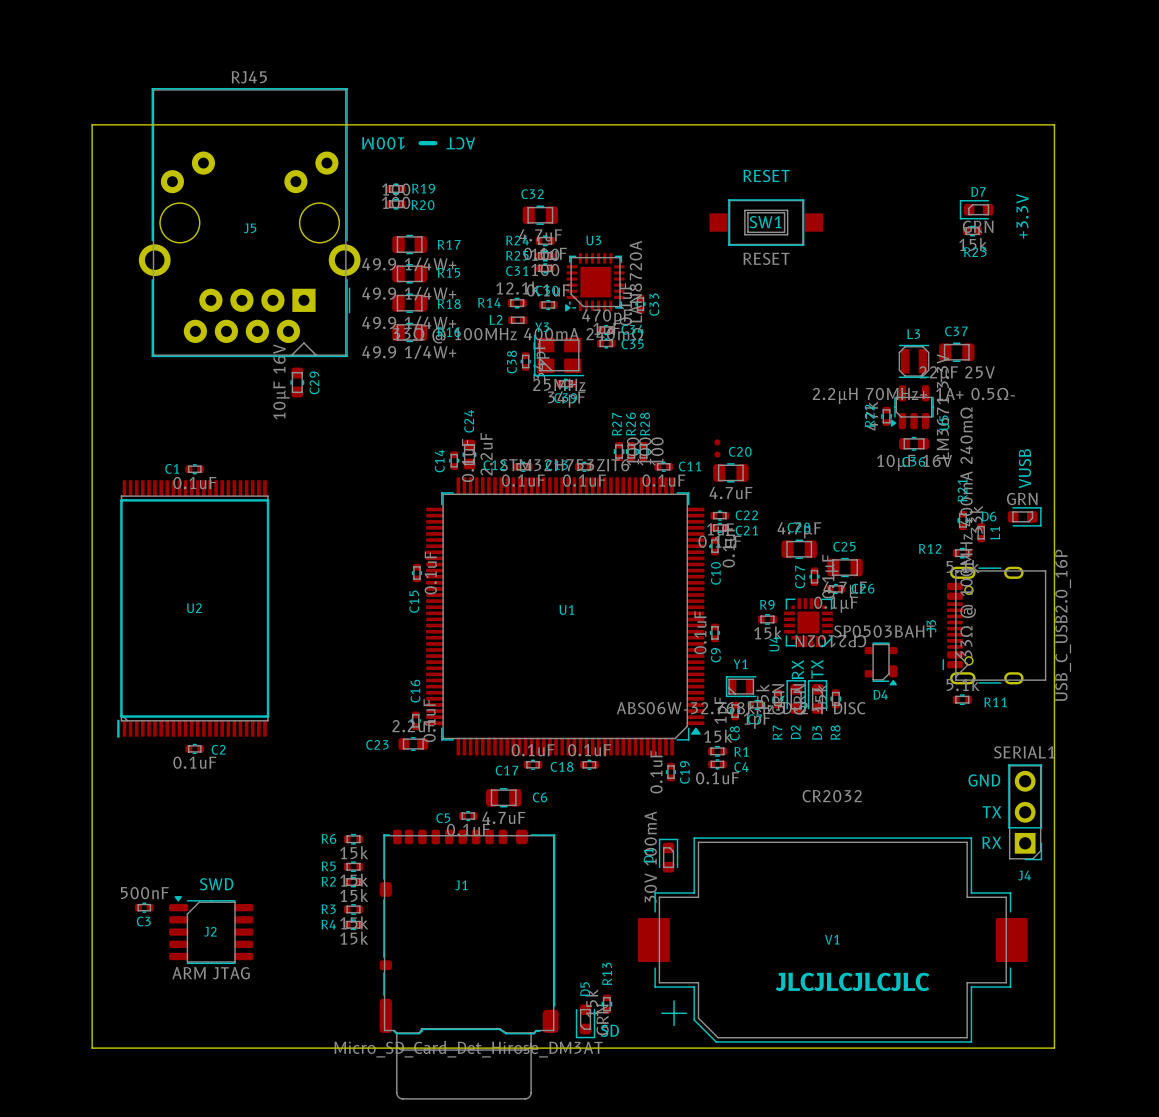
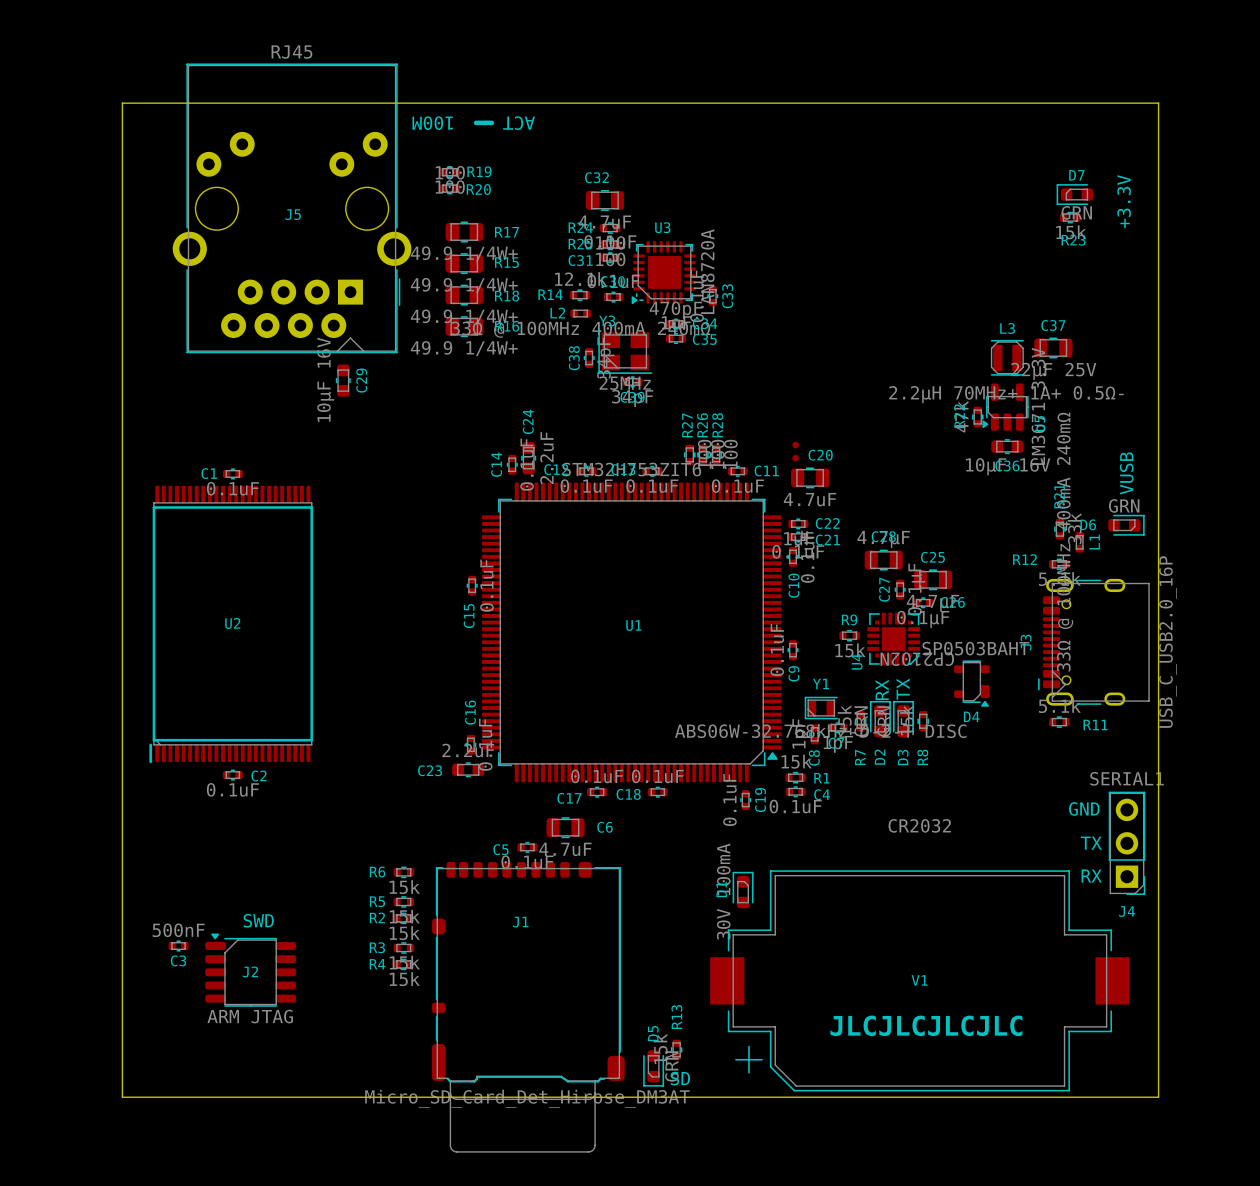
text: RESET (766, 175) -> none
SW1: RESET (766, 222) -> none

